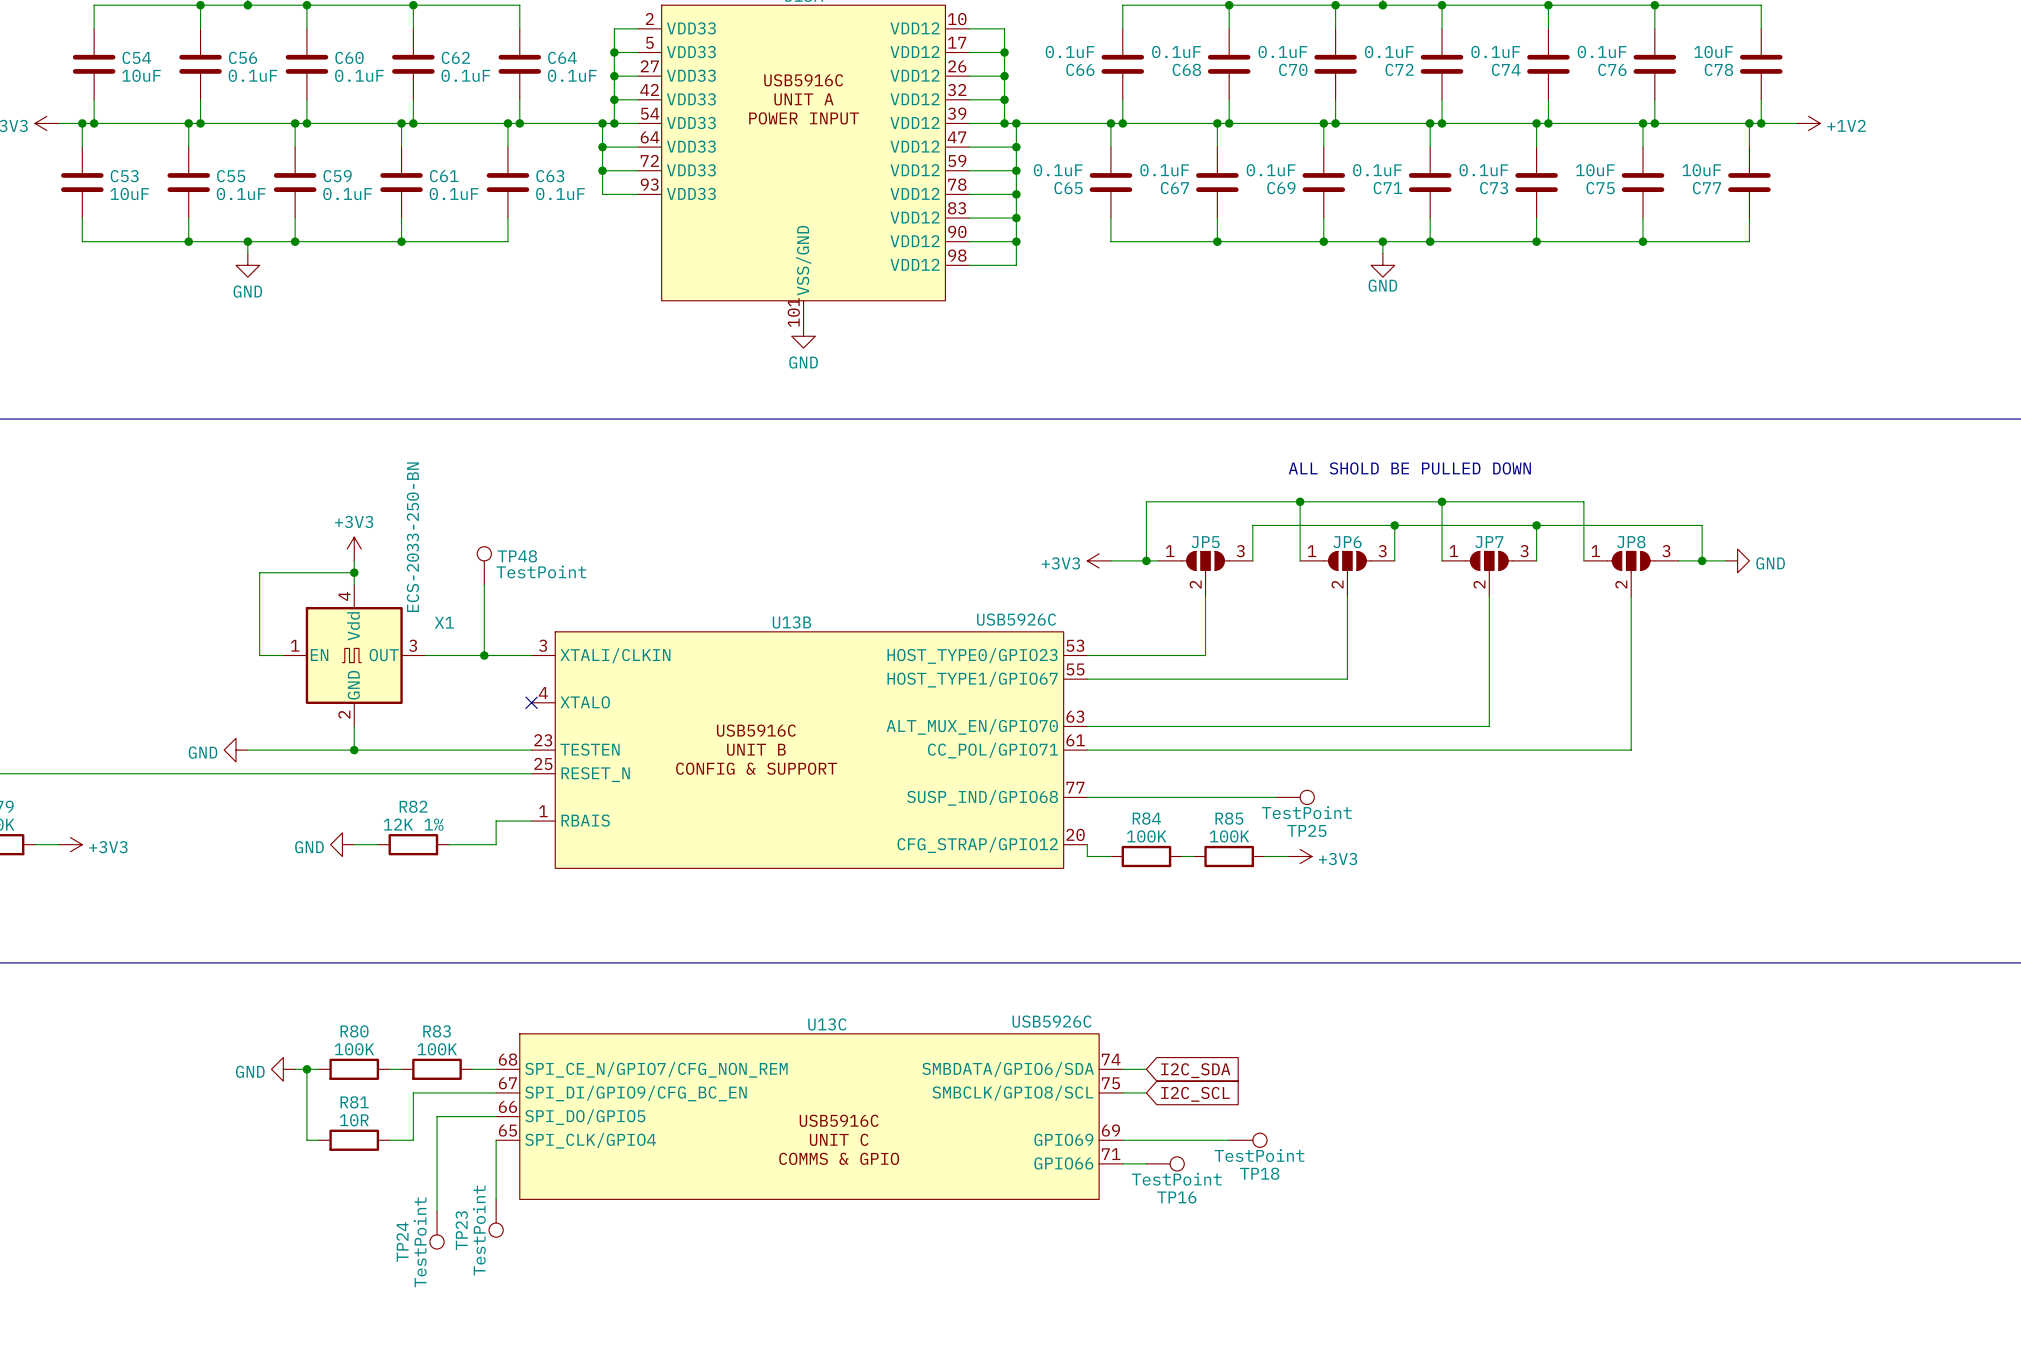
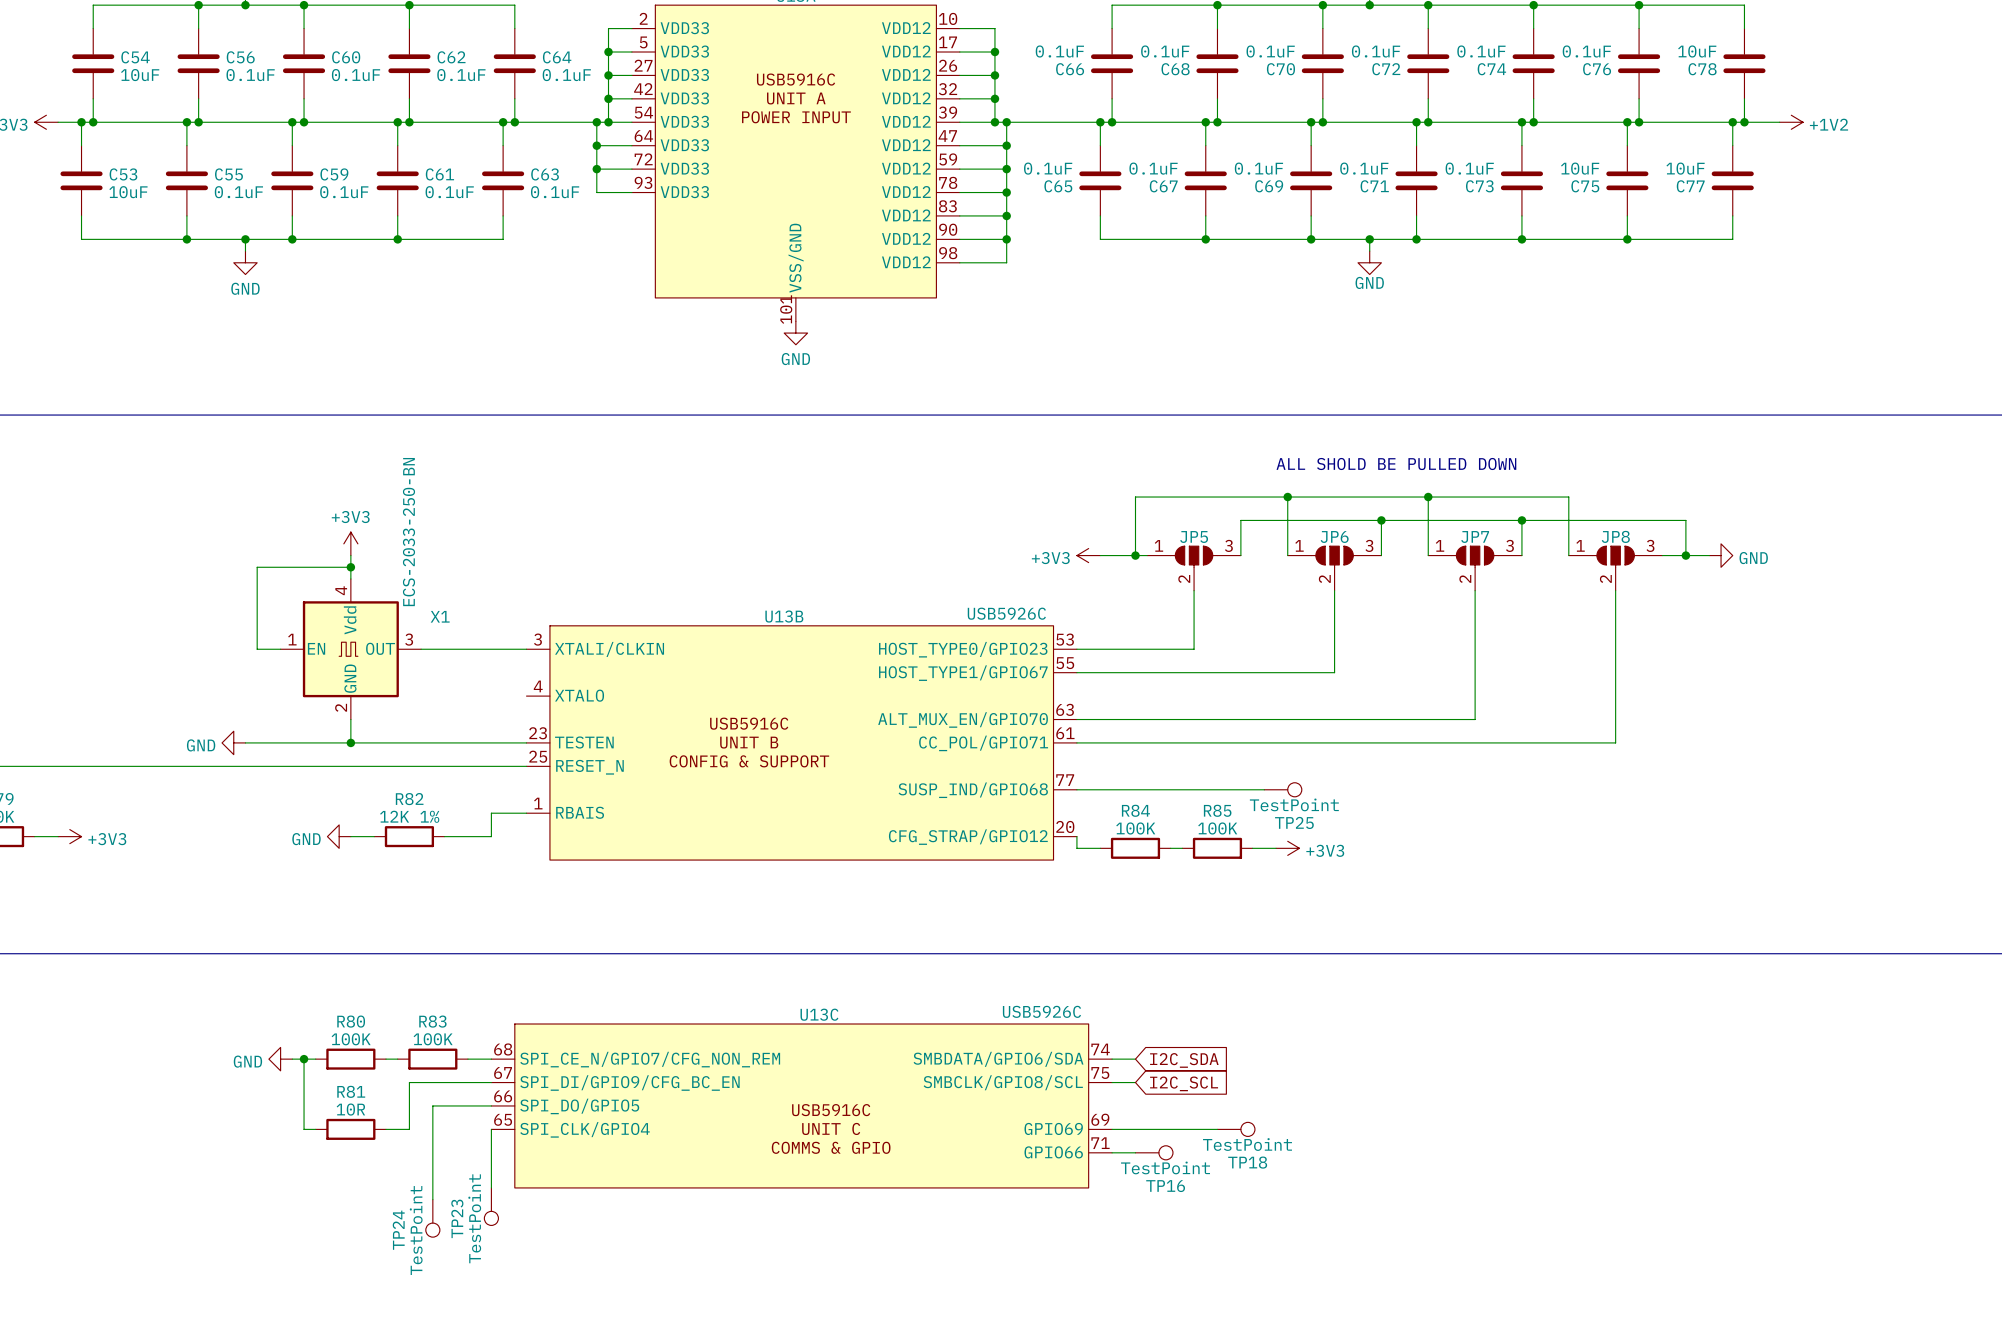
TP48: TestPoint (484, 565) -> none
wire: (484, 584) (484, 655) -> none
junction: (484, 655) -> none
no-connect mark: (531, 702) -> none

